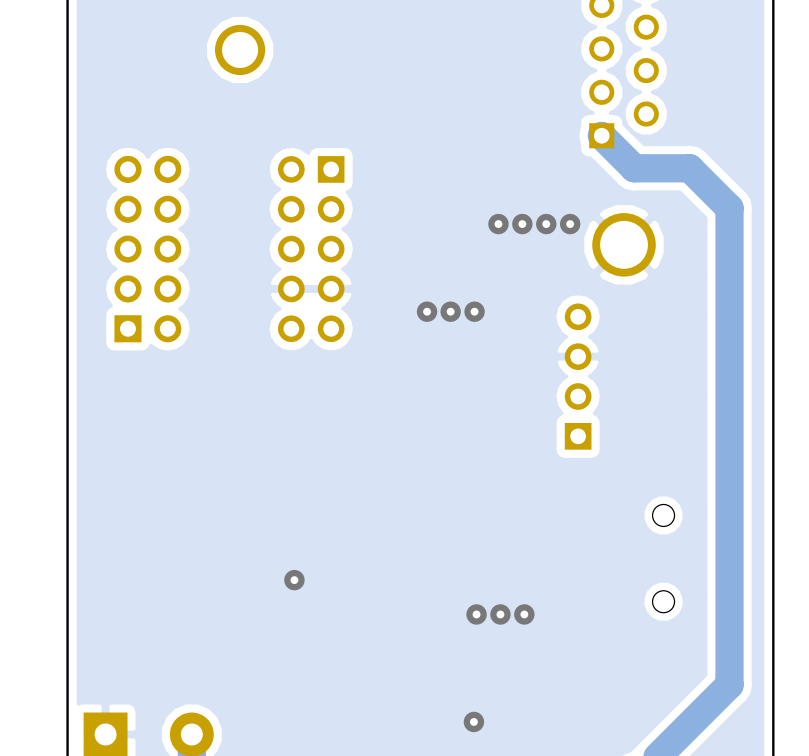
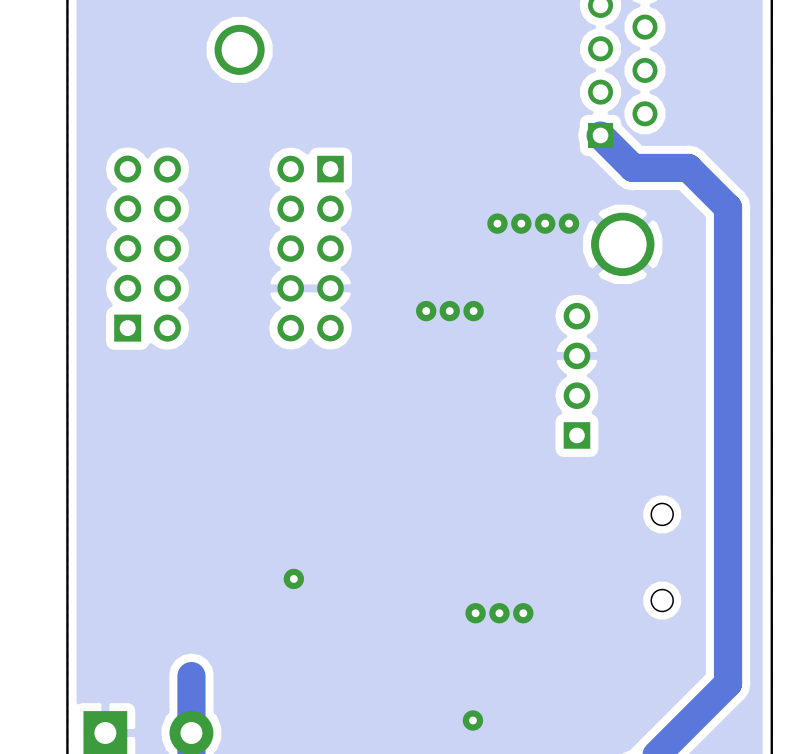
track: none -> (191, 676) (191, 733)

